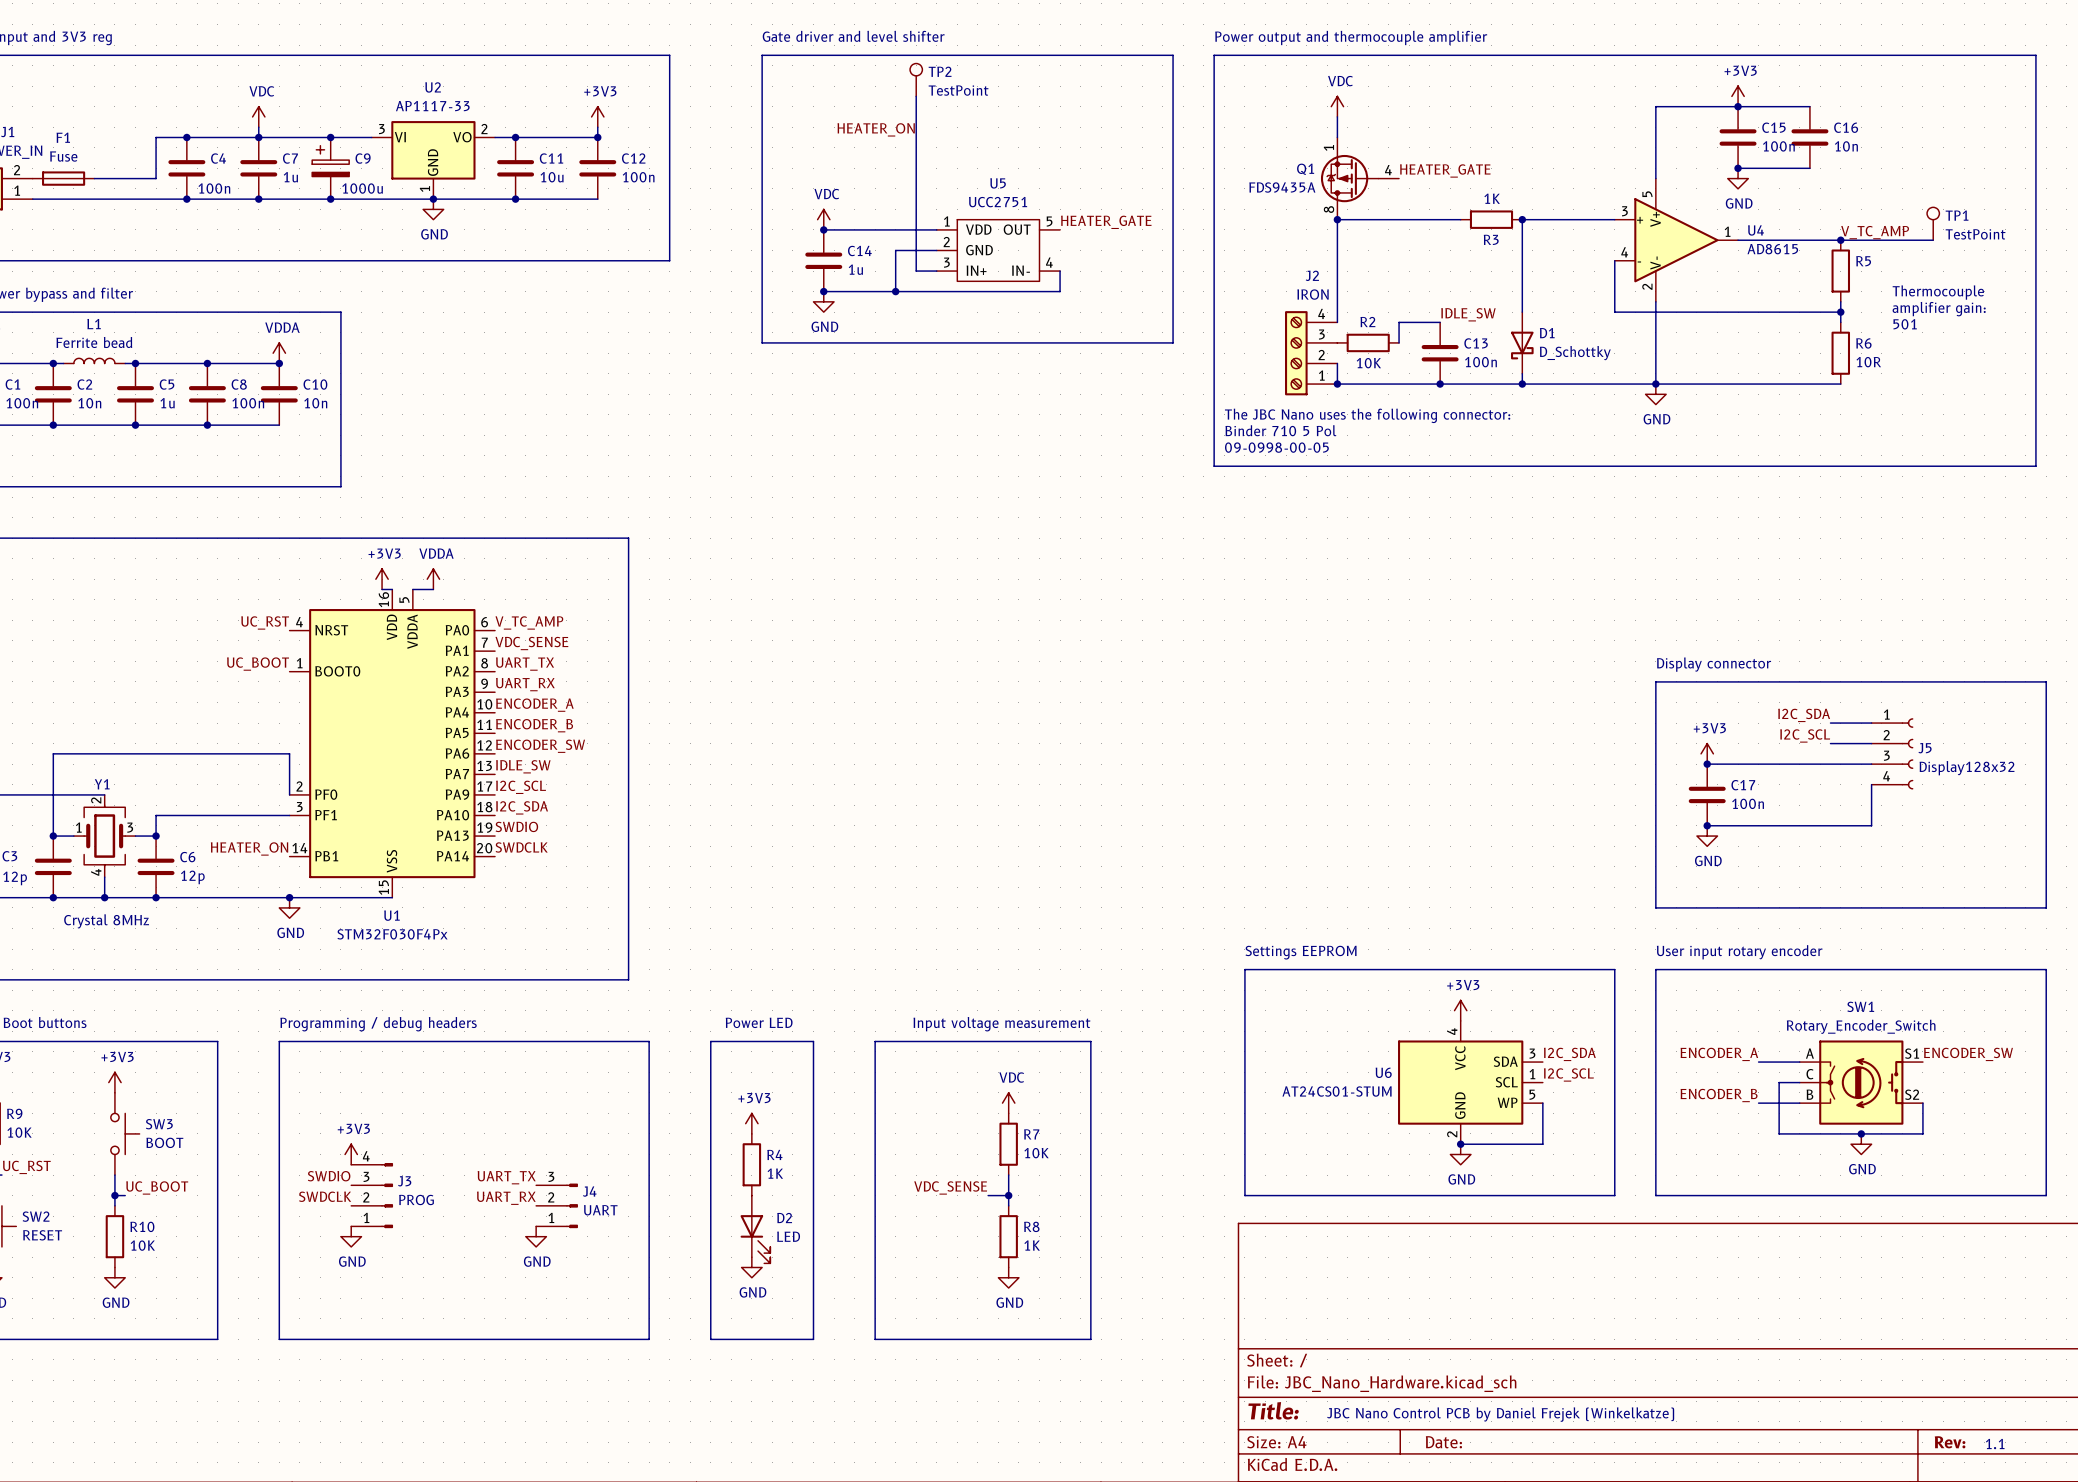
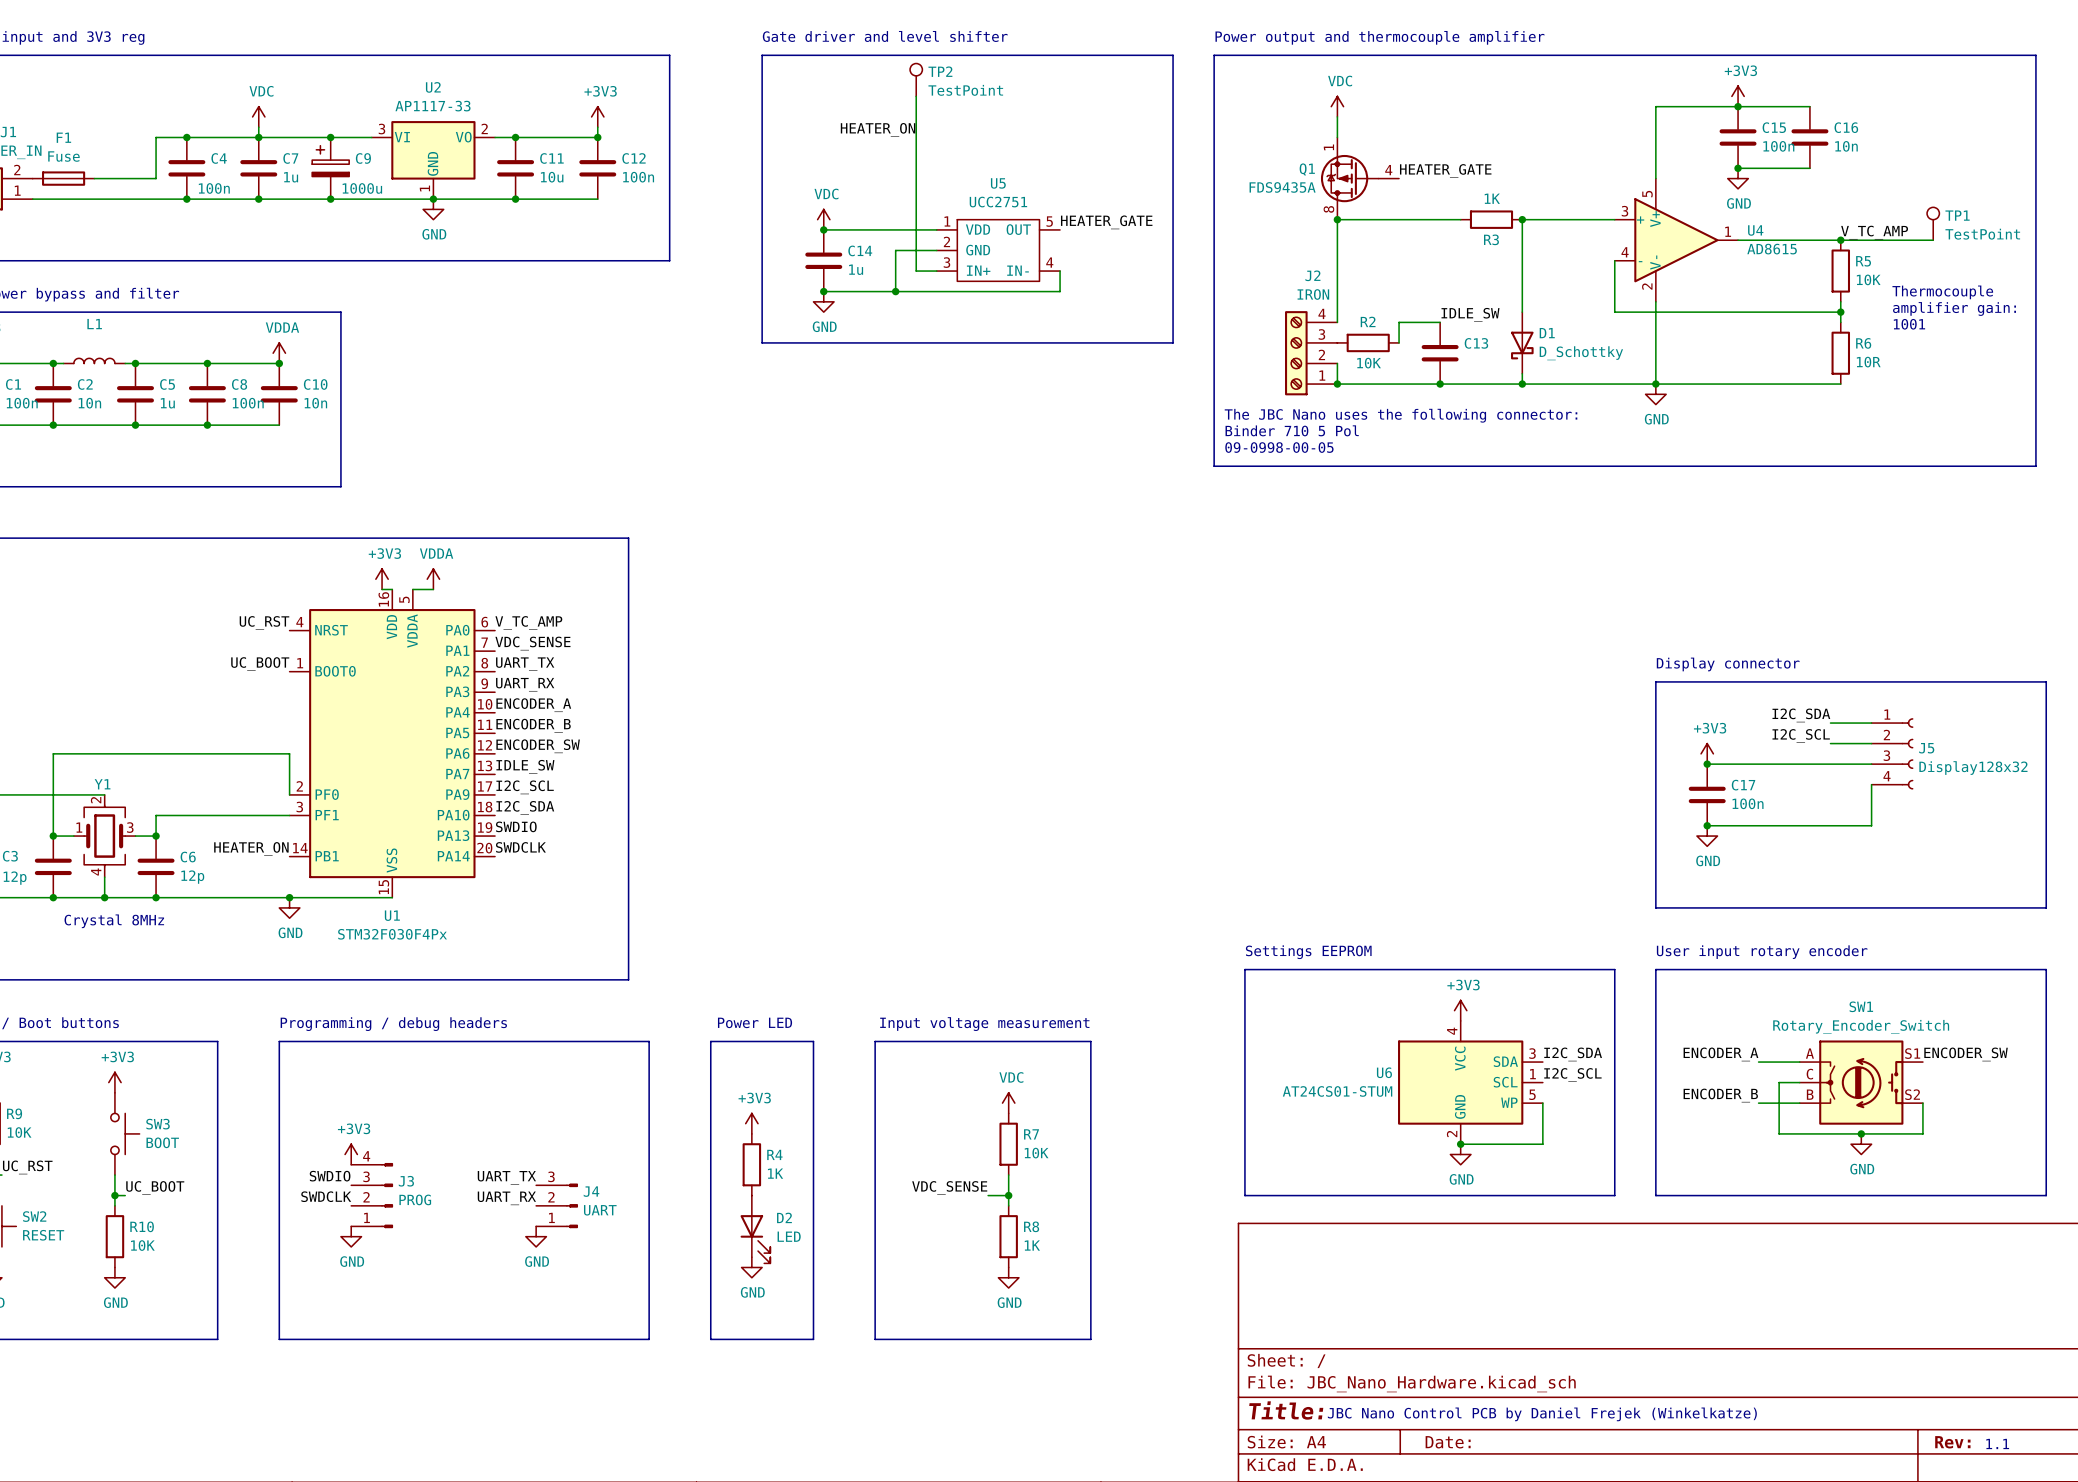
R5 value: none -> 10K (1868, 279)
text: 501 (1905, 324) -> 1001 (1909, 324)
L1 value: Ferrite bead (94, 342) -> none
C13 value: 100n (1480, 362) -> none

